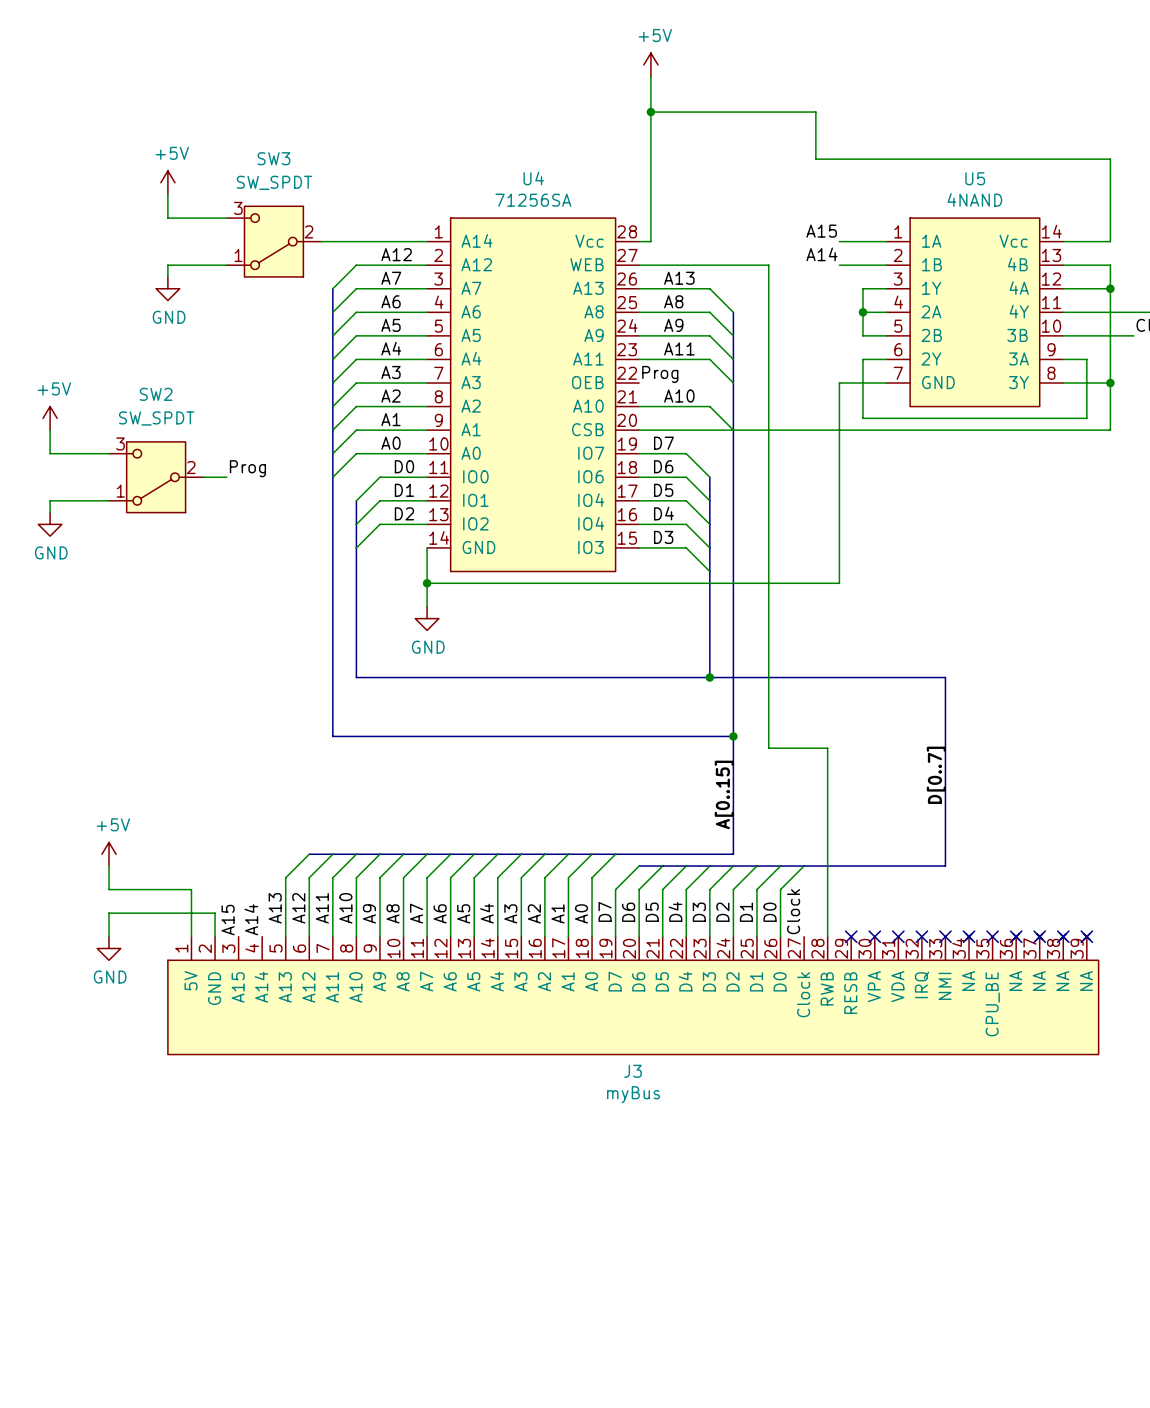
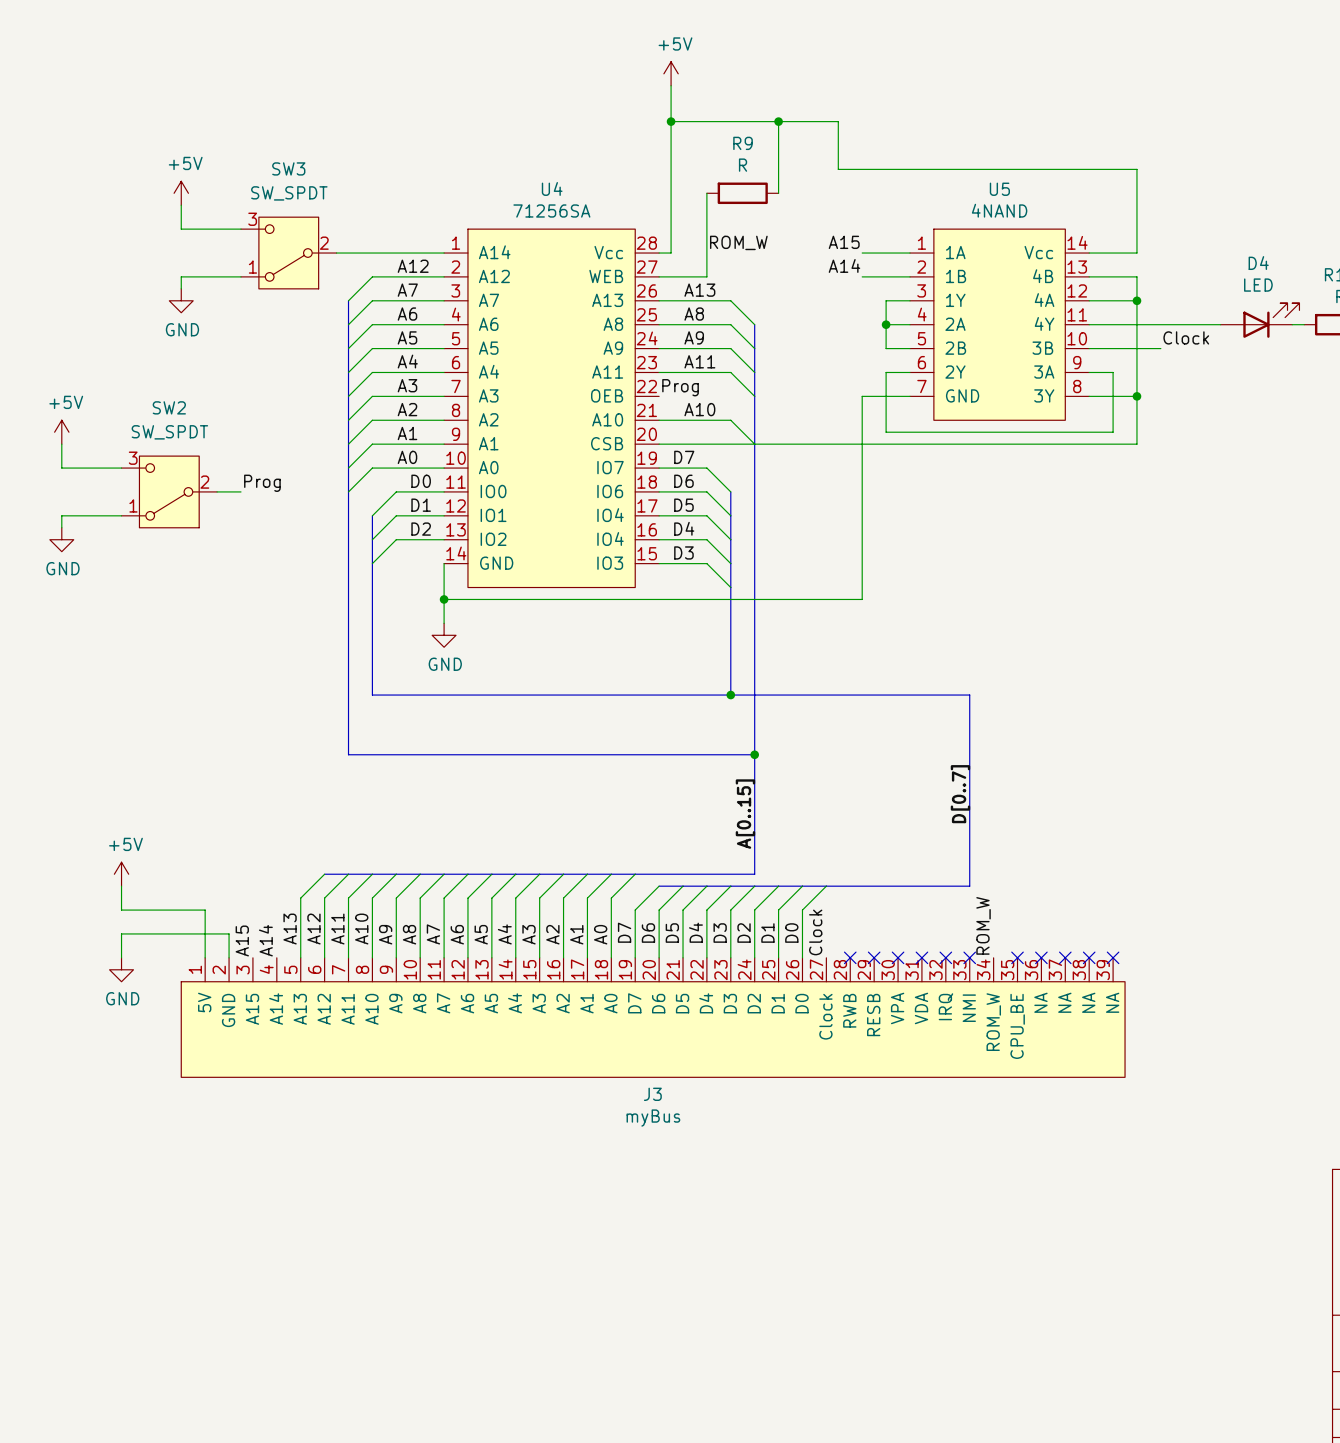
wire: none -> (778, 121) (778, 193)
junction: none -> (778, 121)
R9: none -> R (742, 193)
label: none -> ROM_W (738, 242)
wire: (686, 265) (768, 265) (768, 748) (827, 748) (827, 936) -> (706, 276) (706, 193)
label: none -> ROM_W (983, 925)
J3 symbol: [167, 933, 1099, 1055] -> [181, 957, 1126, 1078]
no-connect mark: none -> (850, 957)
no-connect mark: (969, 936) -> none

